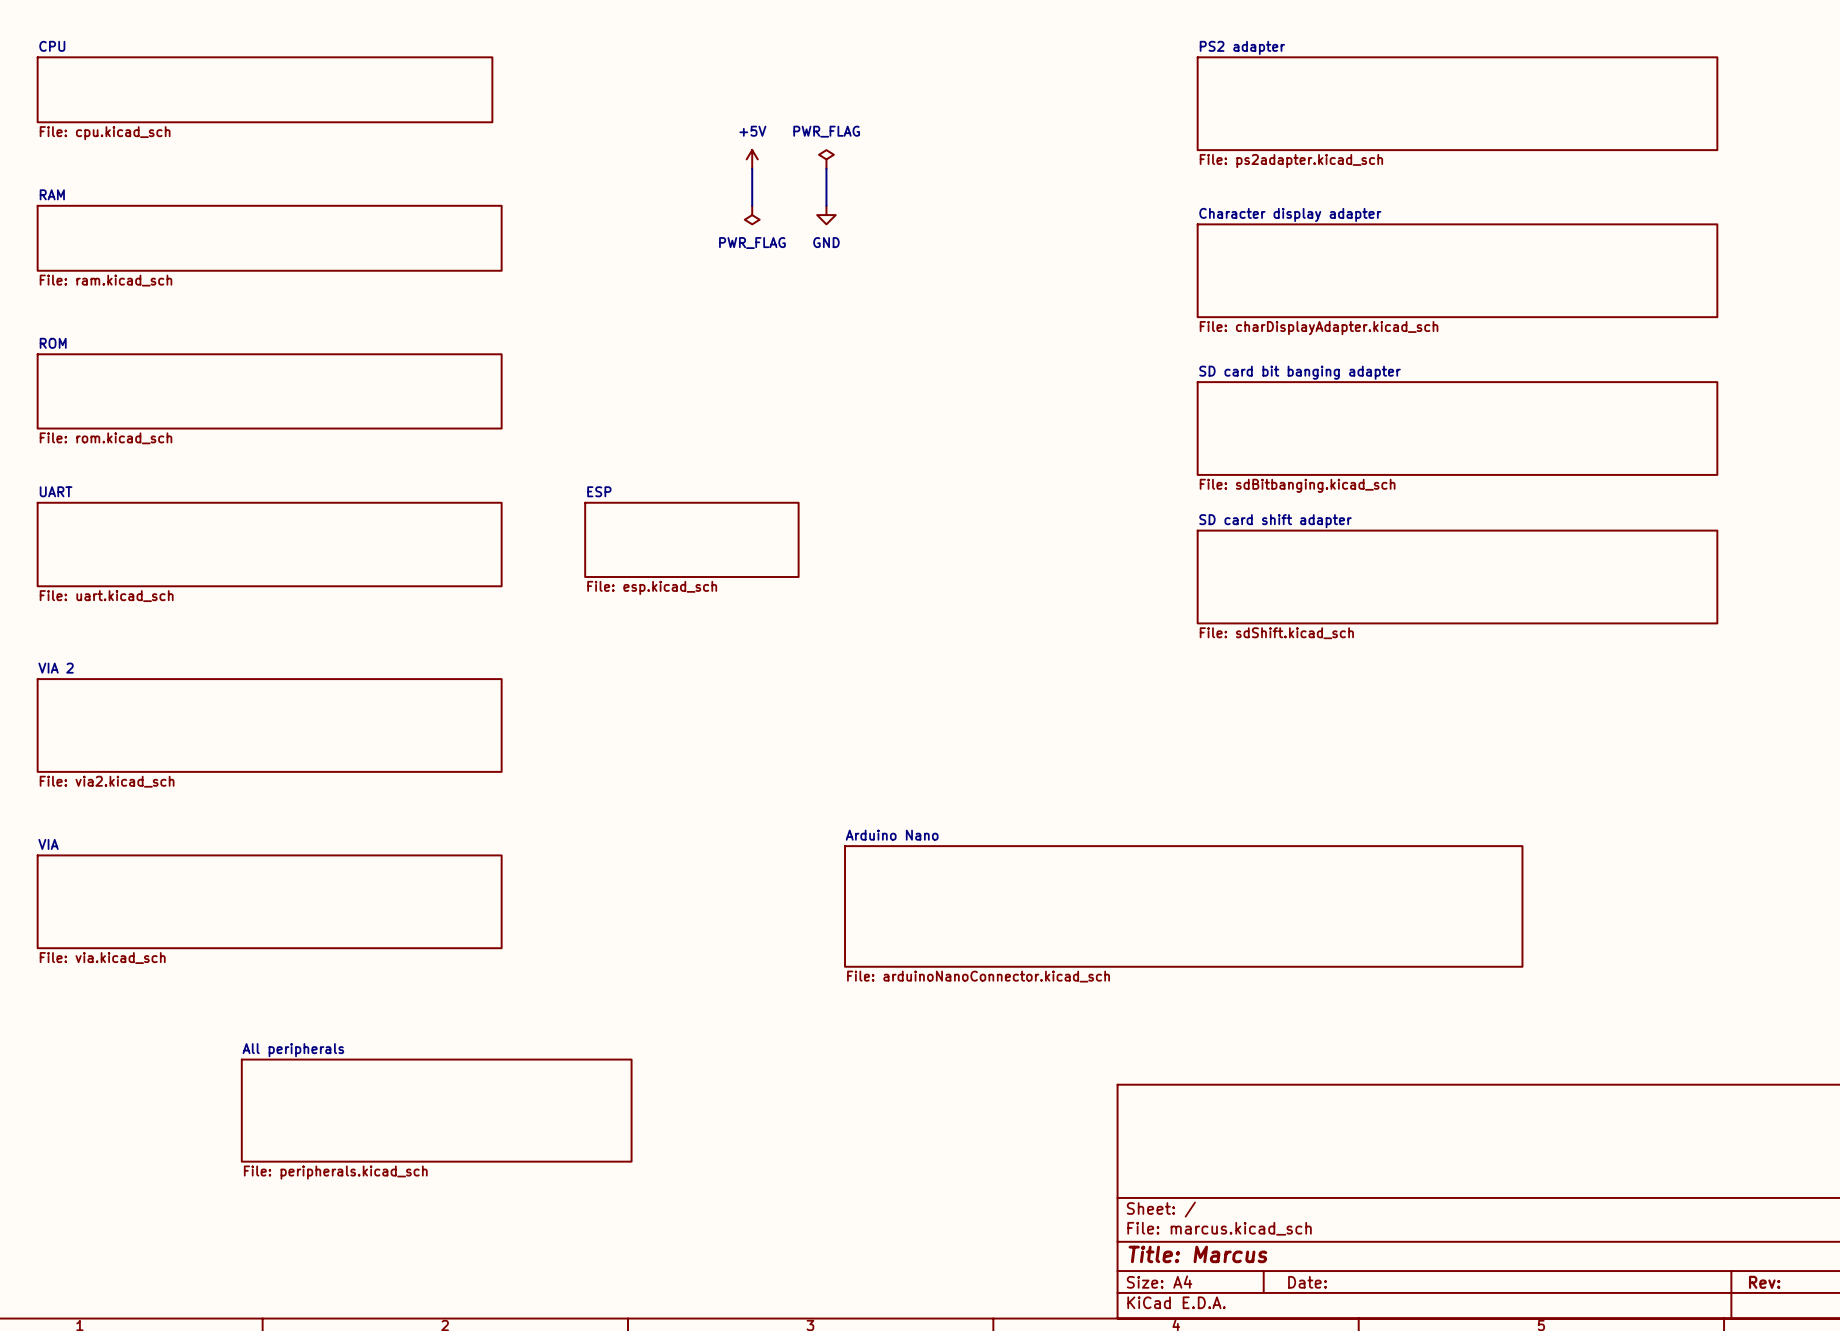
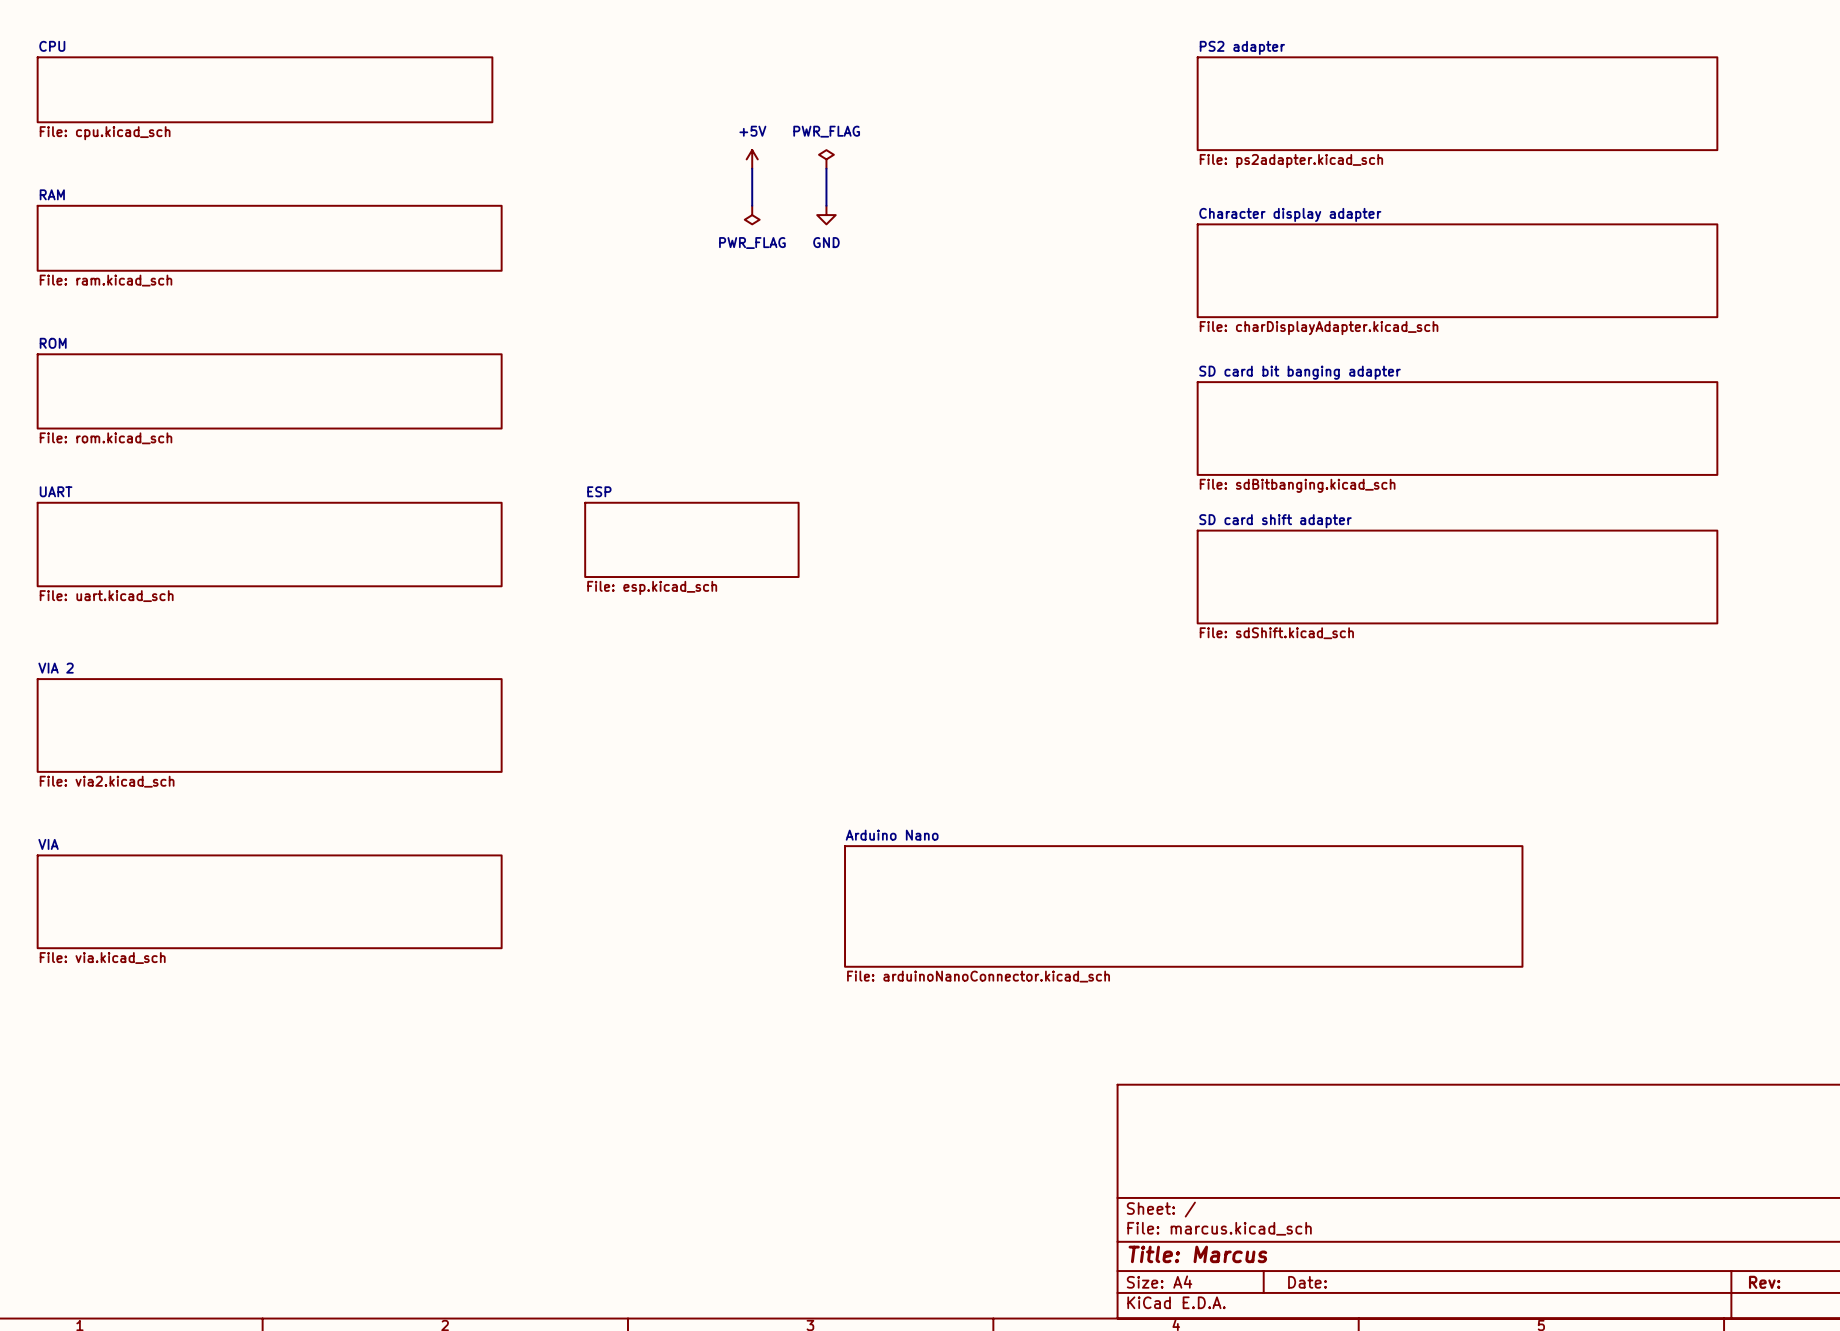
sheet All peripherals: File: peripherals.kicad_sch (436, 1110) -> none

